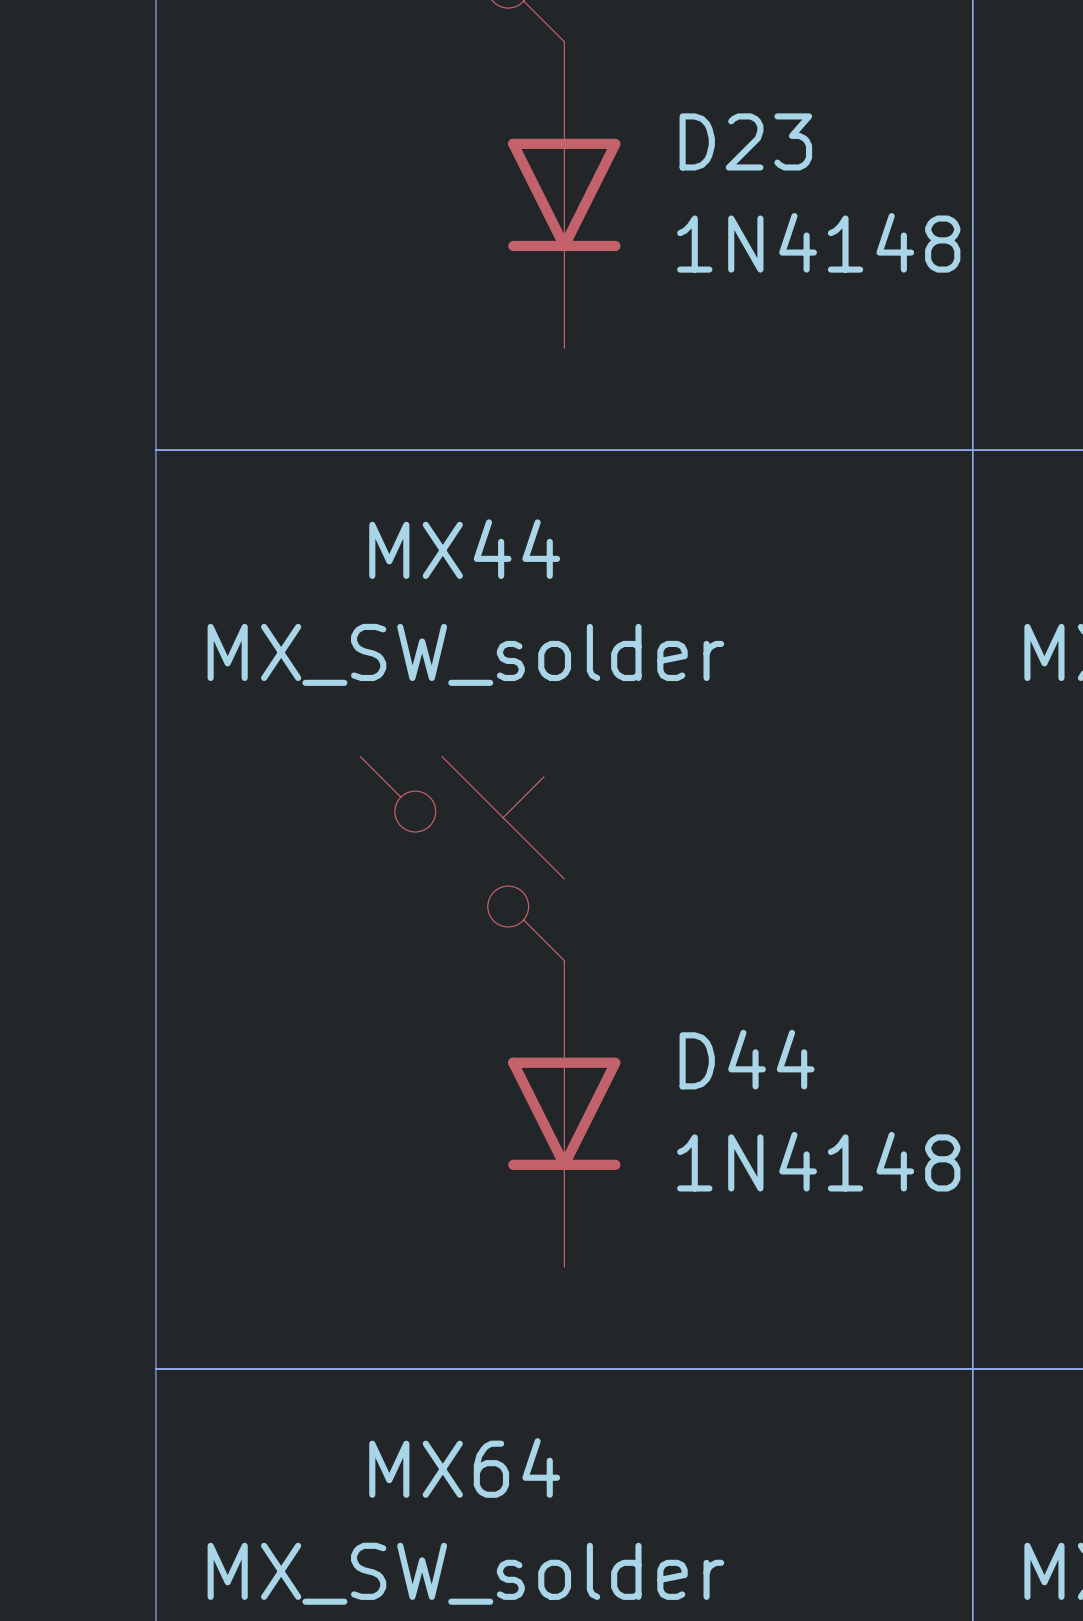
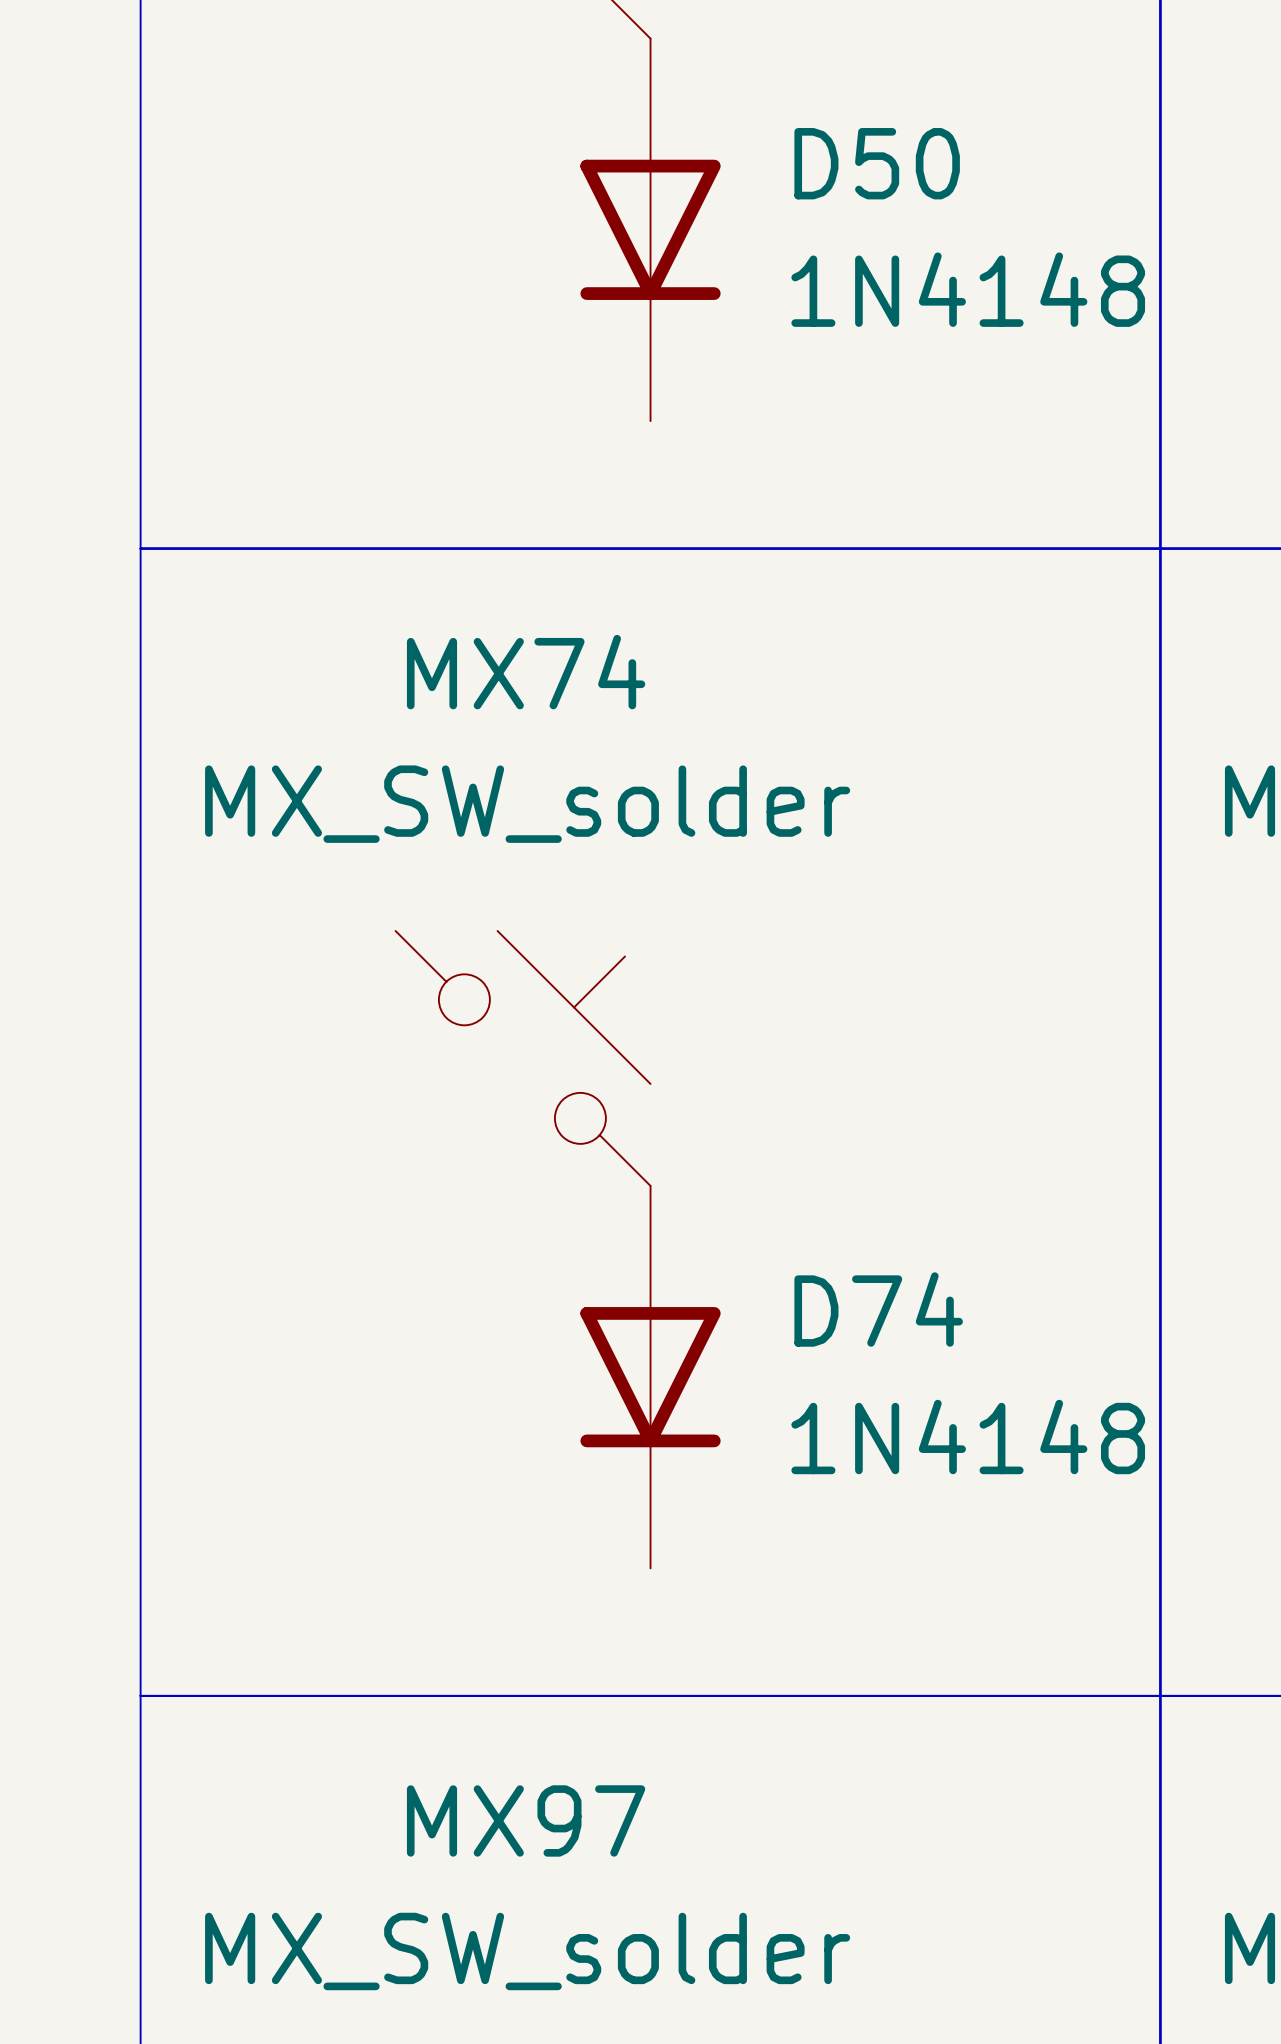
D23 name: D23 (745, 141) -> D50 (877, 163)
MX44 name: MX44 (464, 549) -> MX74 (526, 672)
D44 name: D44 (747, 1059) -> D74 (878, 1309)
MX64 name: MX64 (464, 1468) -> MX97 (526, 1820)

